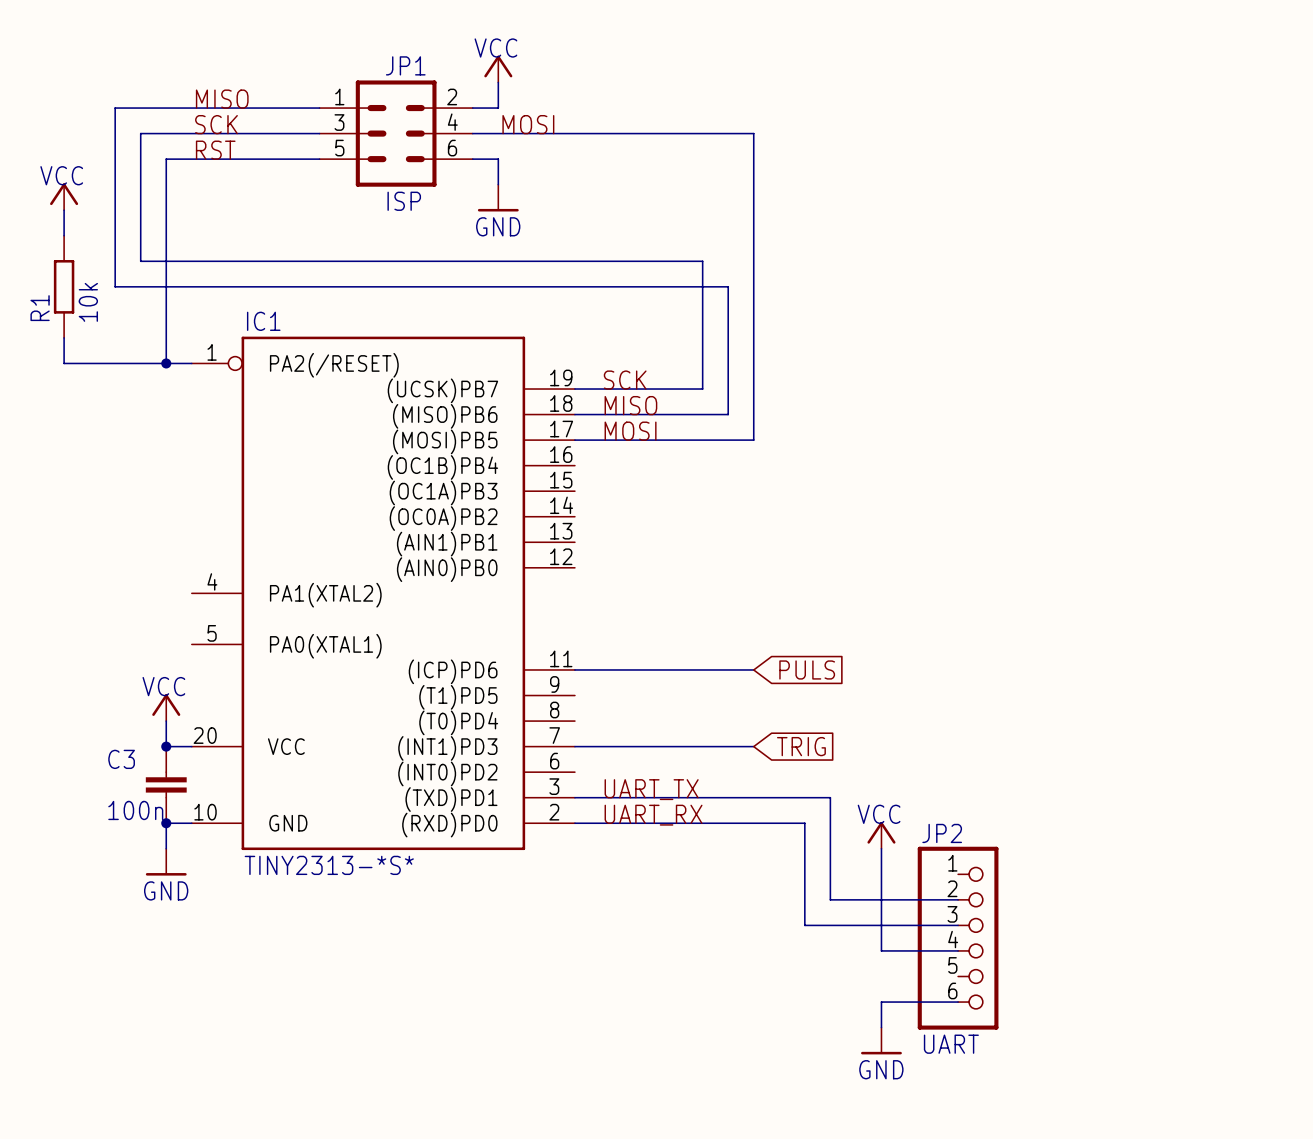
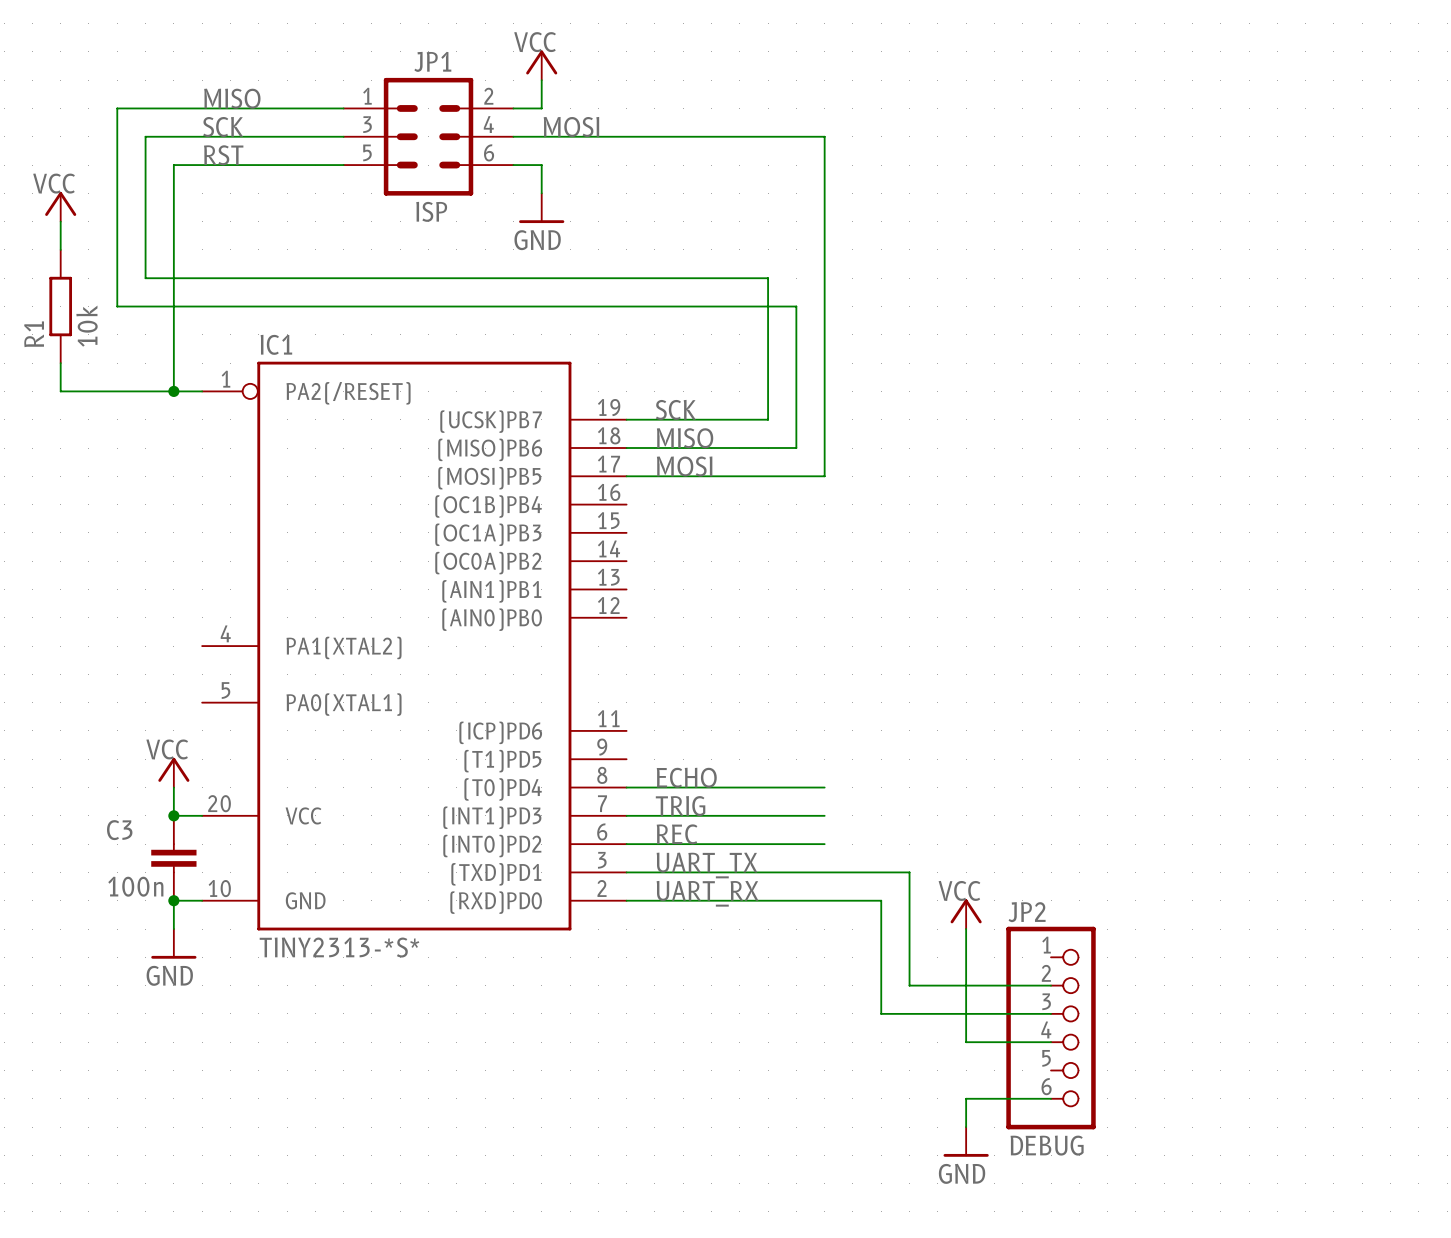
wire: (574, 669) (753, 669) -> (626, 787) (824, 787)
global label: PULS (807, 669) -> none
label: none -> ECHO (686, 777)
label: none -> TRIG (680, 806)
global label: TRIG (801, 746) -> none
label: none -> REC (677, 834)
wire: none -> (626, 844) (824, 844)
JP2 value: UART (951, 1044) -> DEBUG (1047, 1145)

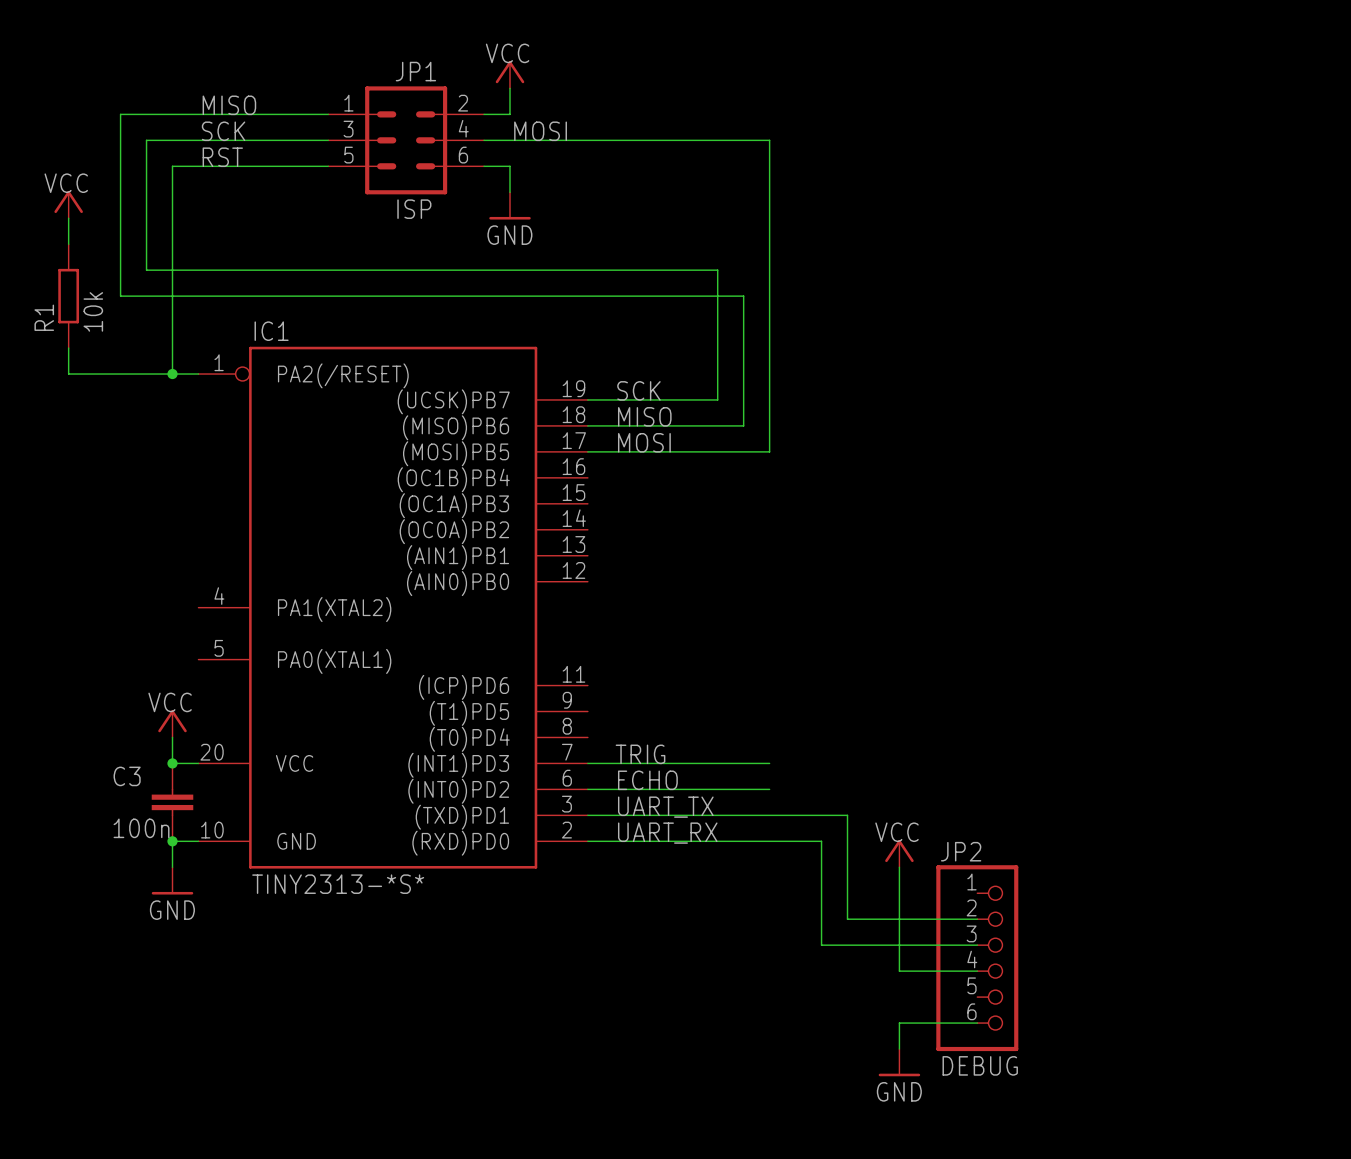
label: ECHO (686, 777) -> none
wire: (626, 787) (824, 787) -> none
label: REC (677, 834) -> ECHO (647, 780)

